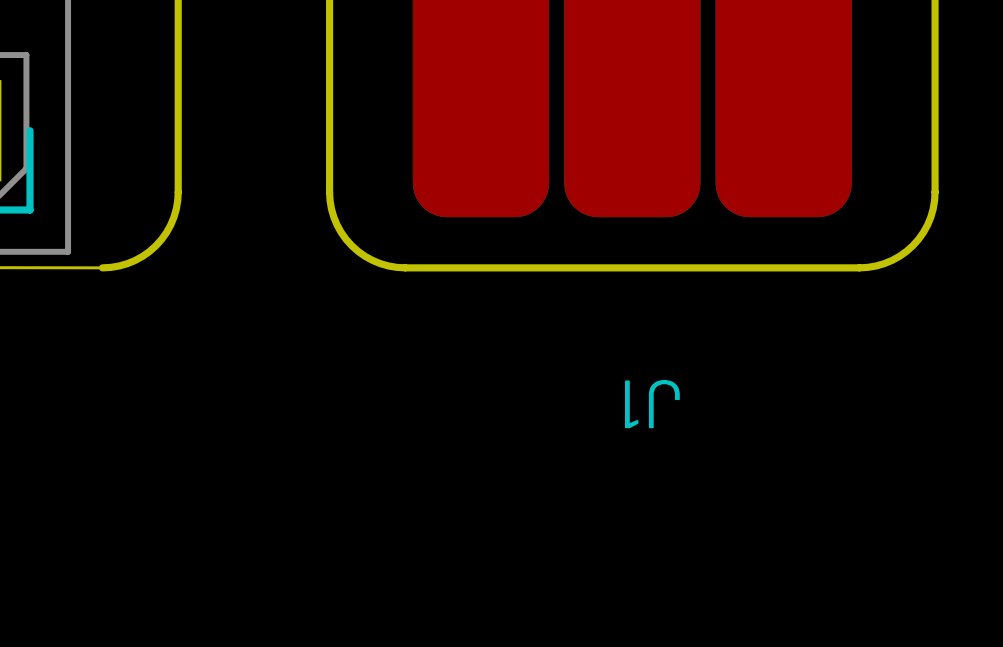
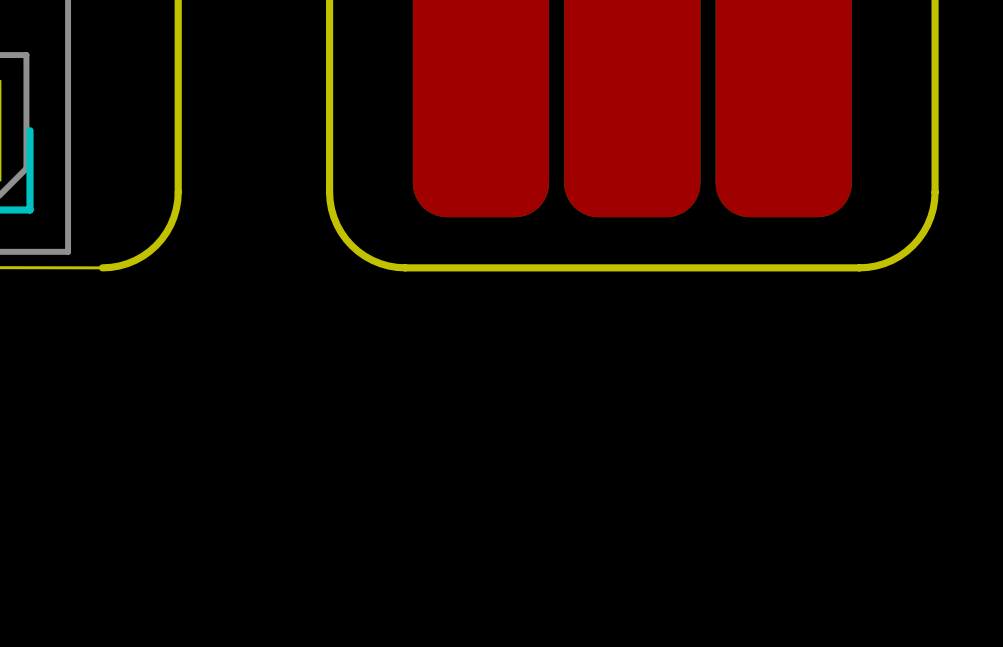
J1 name: J1 (652, 404) -> none

